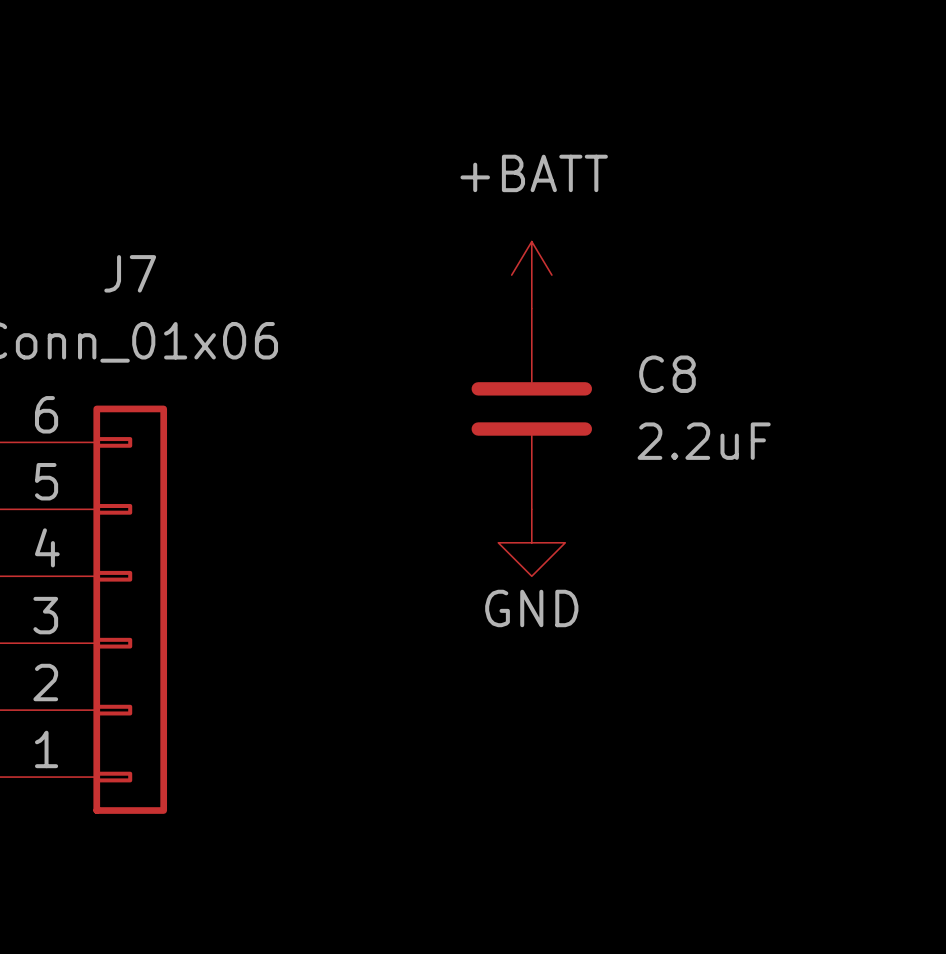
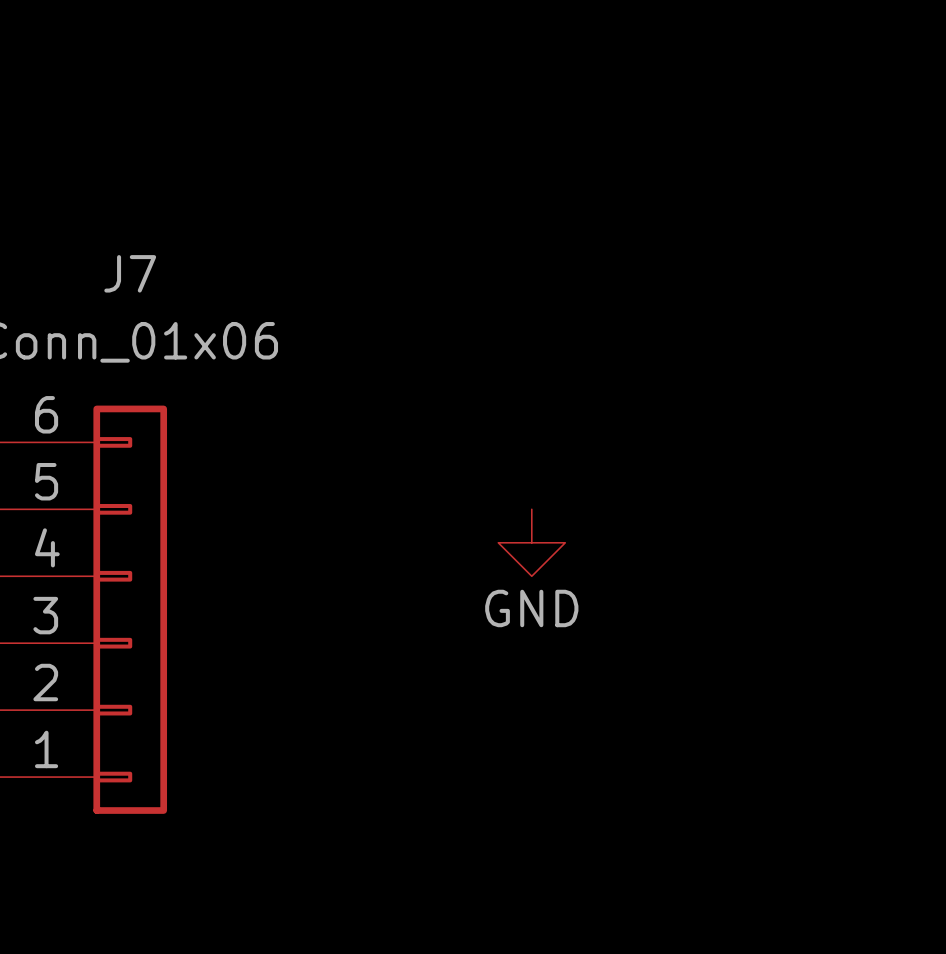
power symbol: +BATT (531, 275) -> none
C8: 2.2uF (531, 408) -> none

